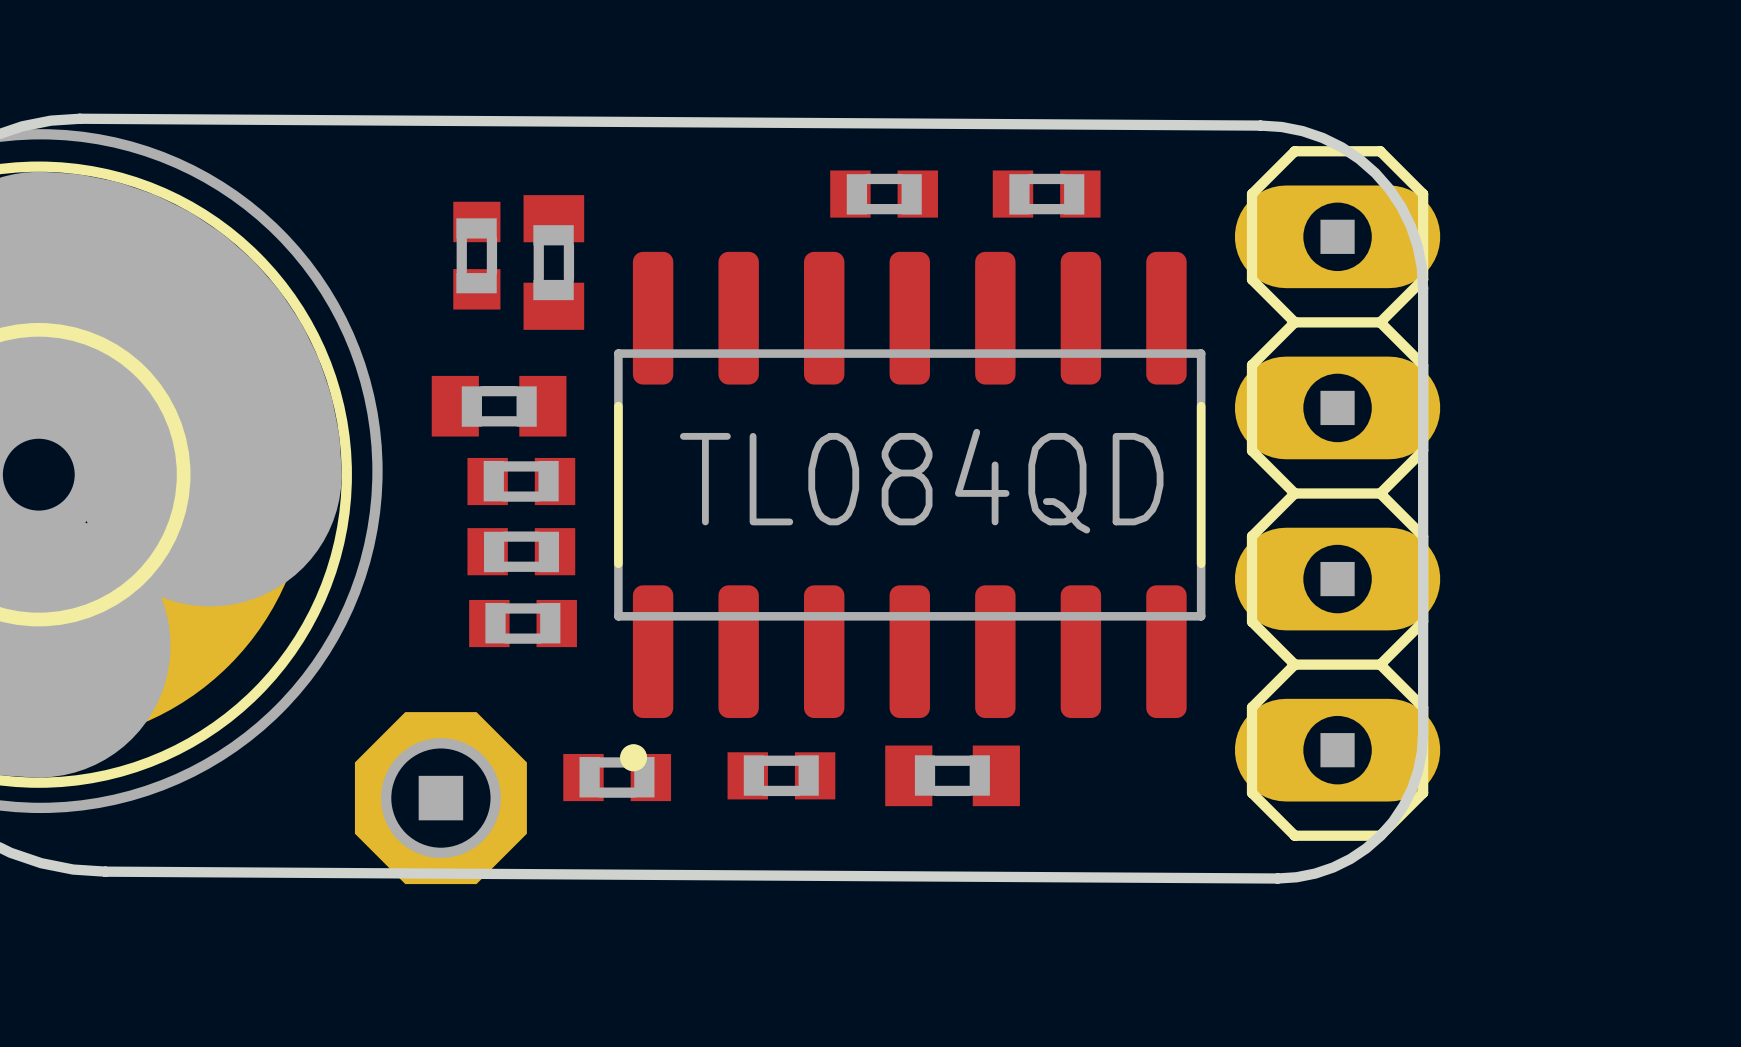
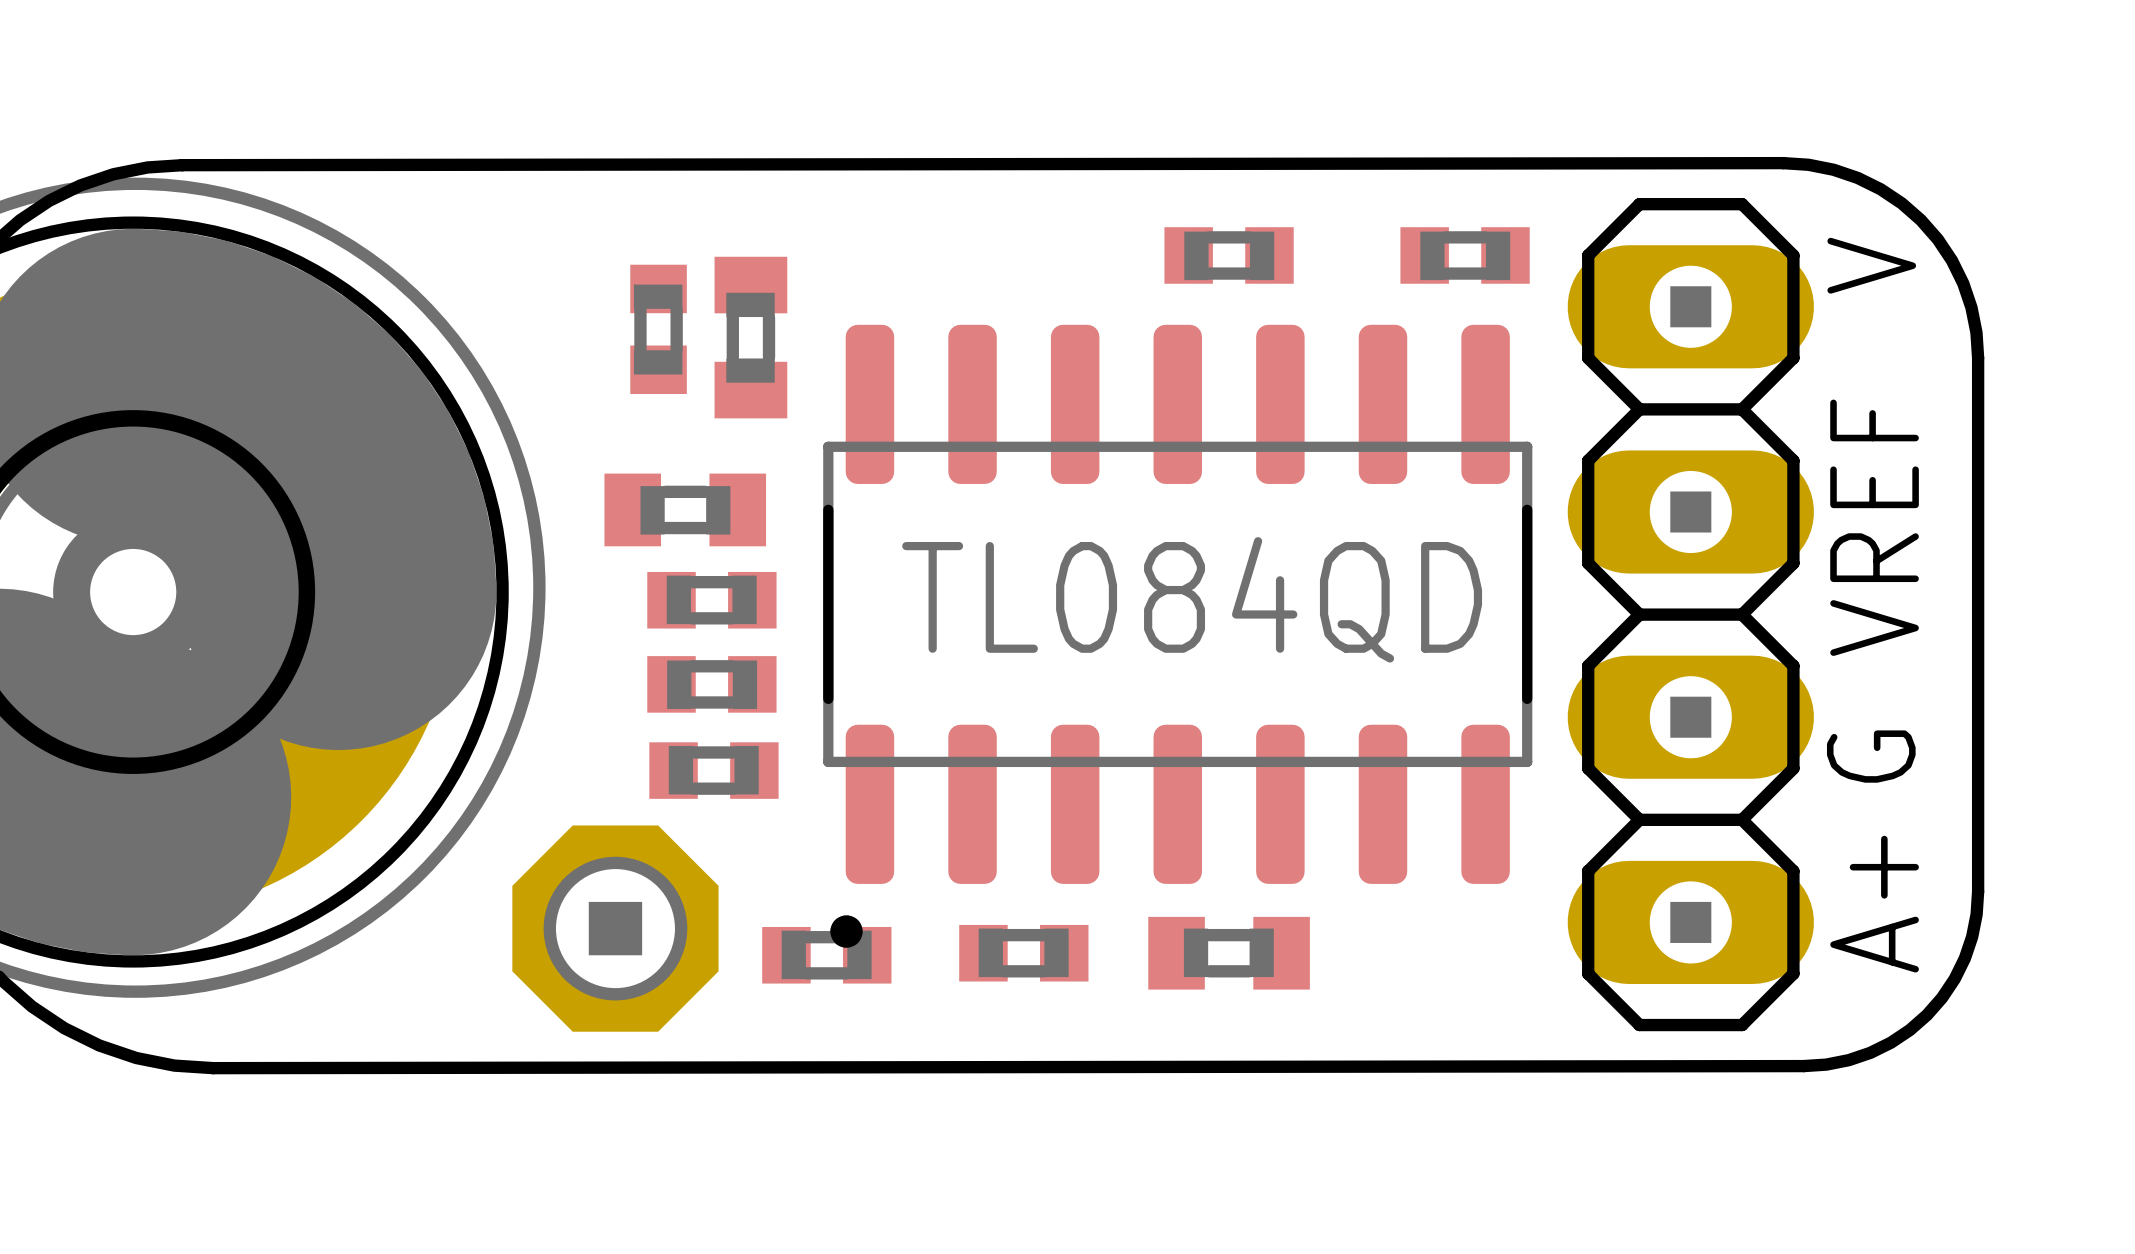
board edge: (79, 118) (1281, 126) (1302, 131) (1341, 147) (1359, 159) (1389, 189) (1401, 206) (1417, 246) (1423, 288) (1421, 752) (1412, 788) (1393, 821) (1366, 848) (1333, 867) (1296, 877) (1277, 878) (105, 871) -> (182, 165) (1783, 163) (1808, 164) (1833, 169) (1857, 177) (1880, 189) (1901, 203) (1921, 220) (1937, 239) (1952, 260) (1963, 283) (1971, 307) (1976, 332) (1978, 358) (1976, 914) (1964, 958) (1942, 997) (1909, 1030) (1870, 1052) (1826, 1064) (1803, 1066) (213, 1068)
part: (884, 194) -> none
part: none -> (1229, 255)
part: (1046, 194) -> none
part: none -> (1465, 255)
text: none -> V (1871, 265)
text: none -> VREF (1874, 527)
text: none -> G (1871, 756)
text: none -> A+ (1874, 904)
part position: (440, 798) -> (615, 928)

